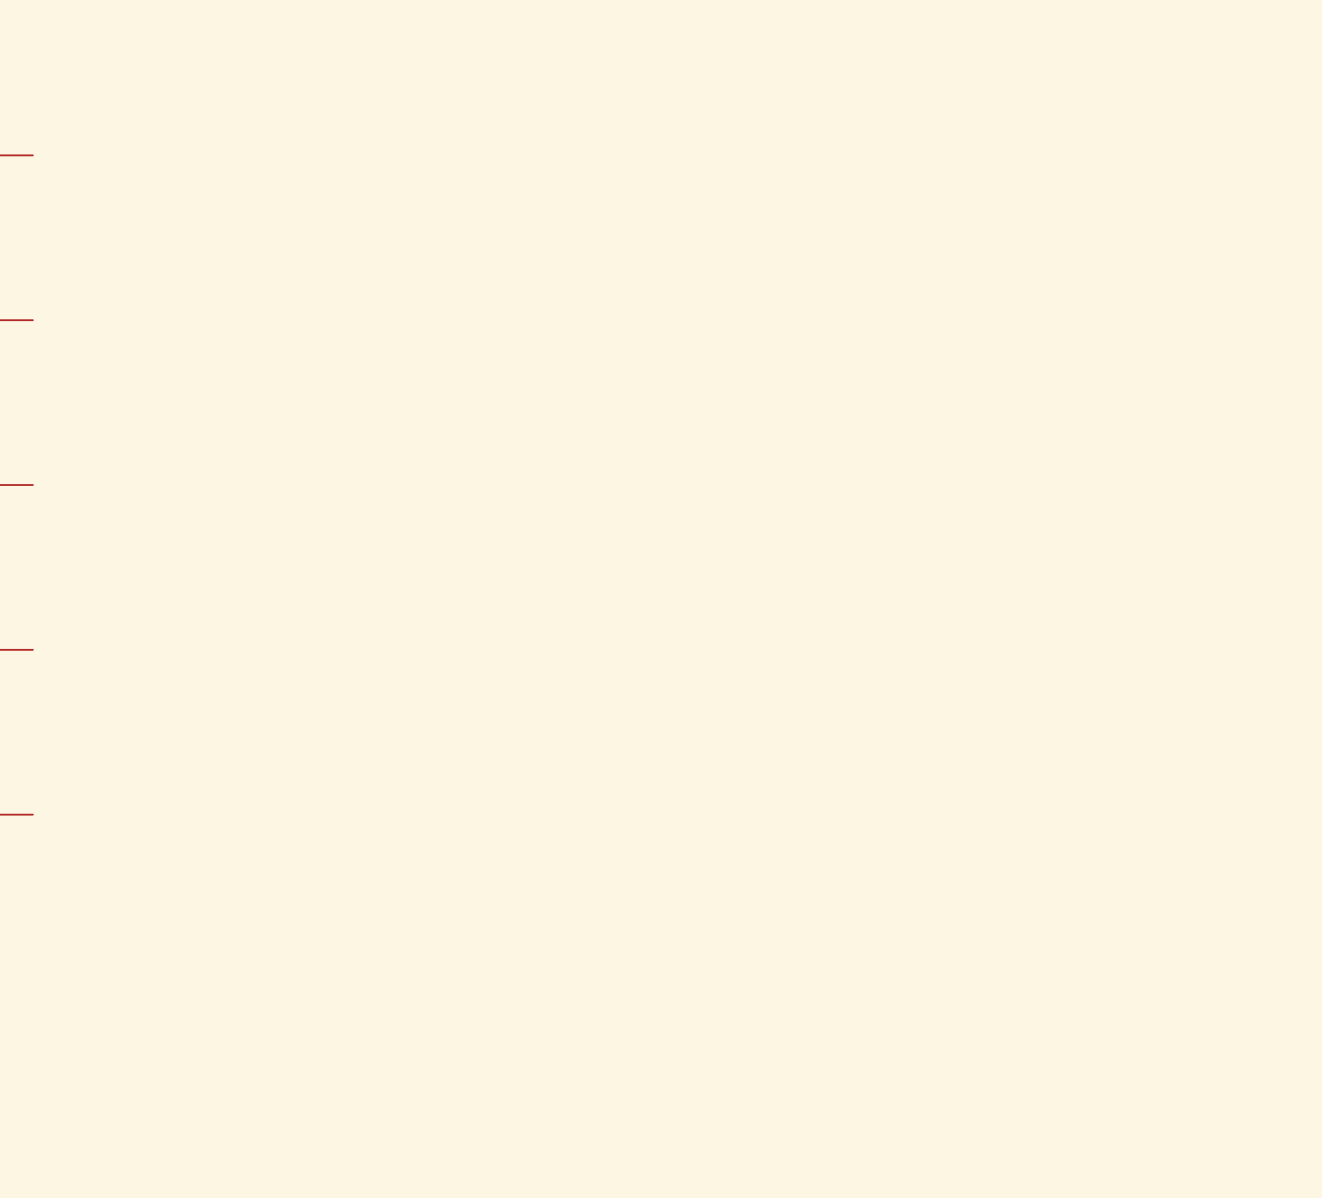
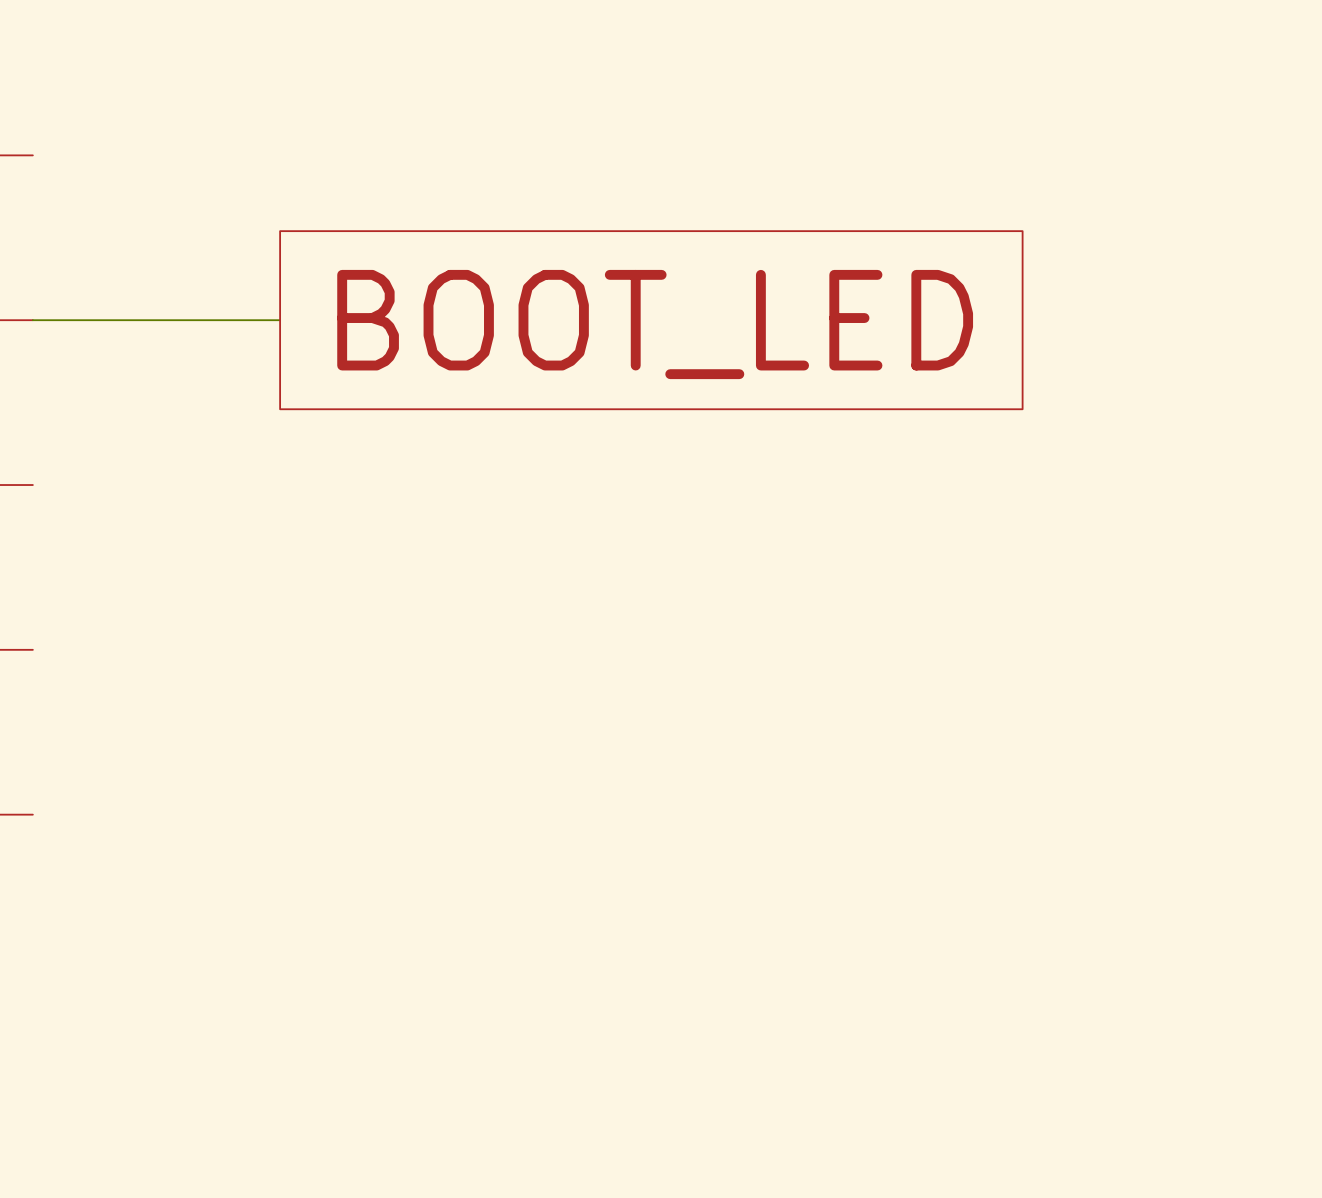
wire: none -> (32, 320) (280, 320)
global label: none -> BOOT_LED (655, 324)

